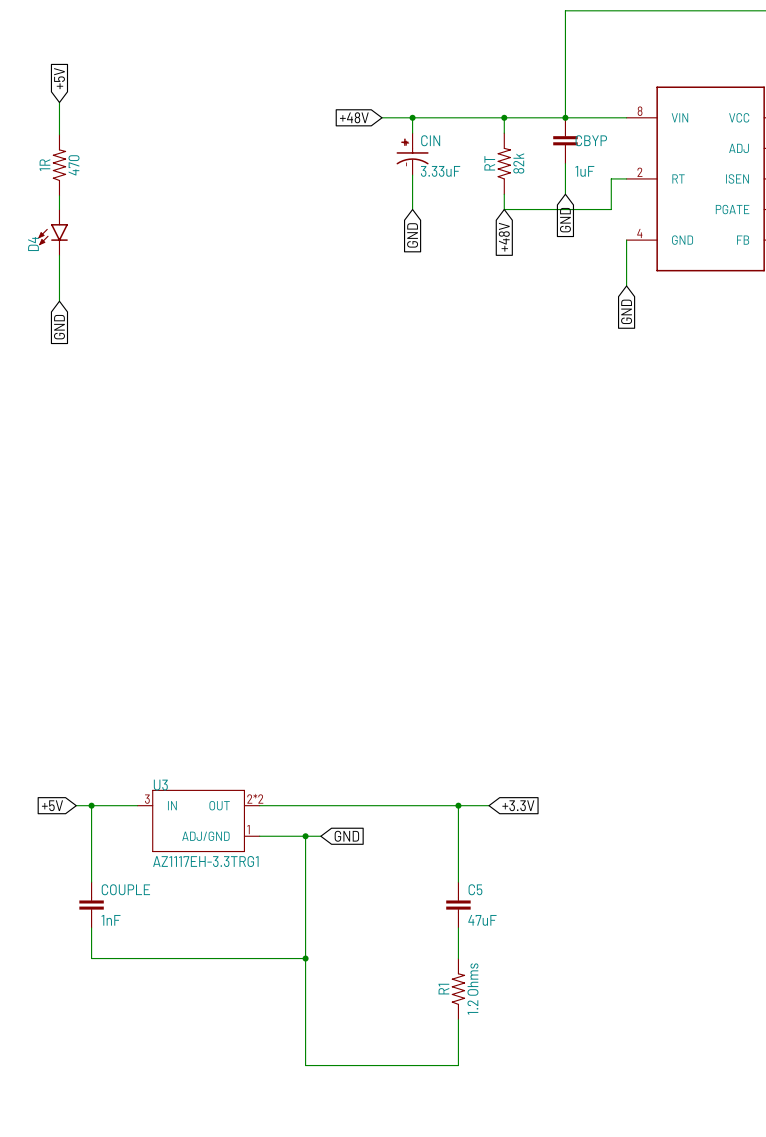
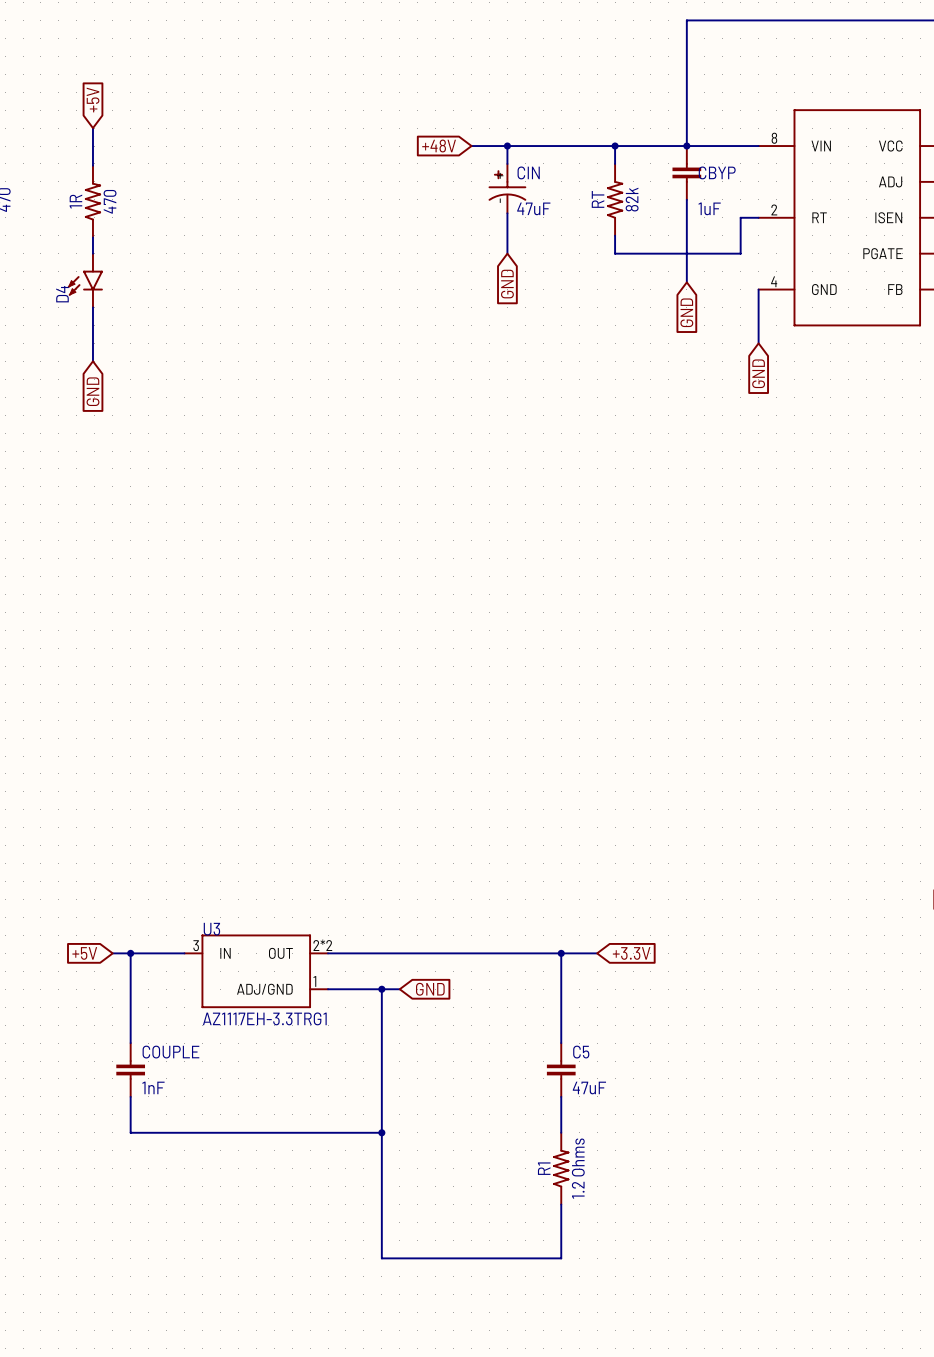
CIN value: 3.33uF (440, 171) -> 47uF (533, 208)
wire: none -> (686, 235) (686, 282)
global label position: GND (565, 220) -> GND (686, 312)
global label: +48V (504, 237) -> none

